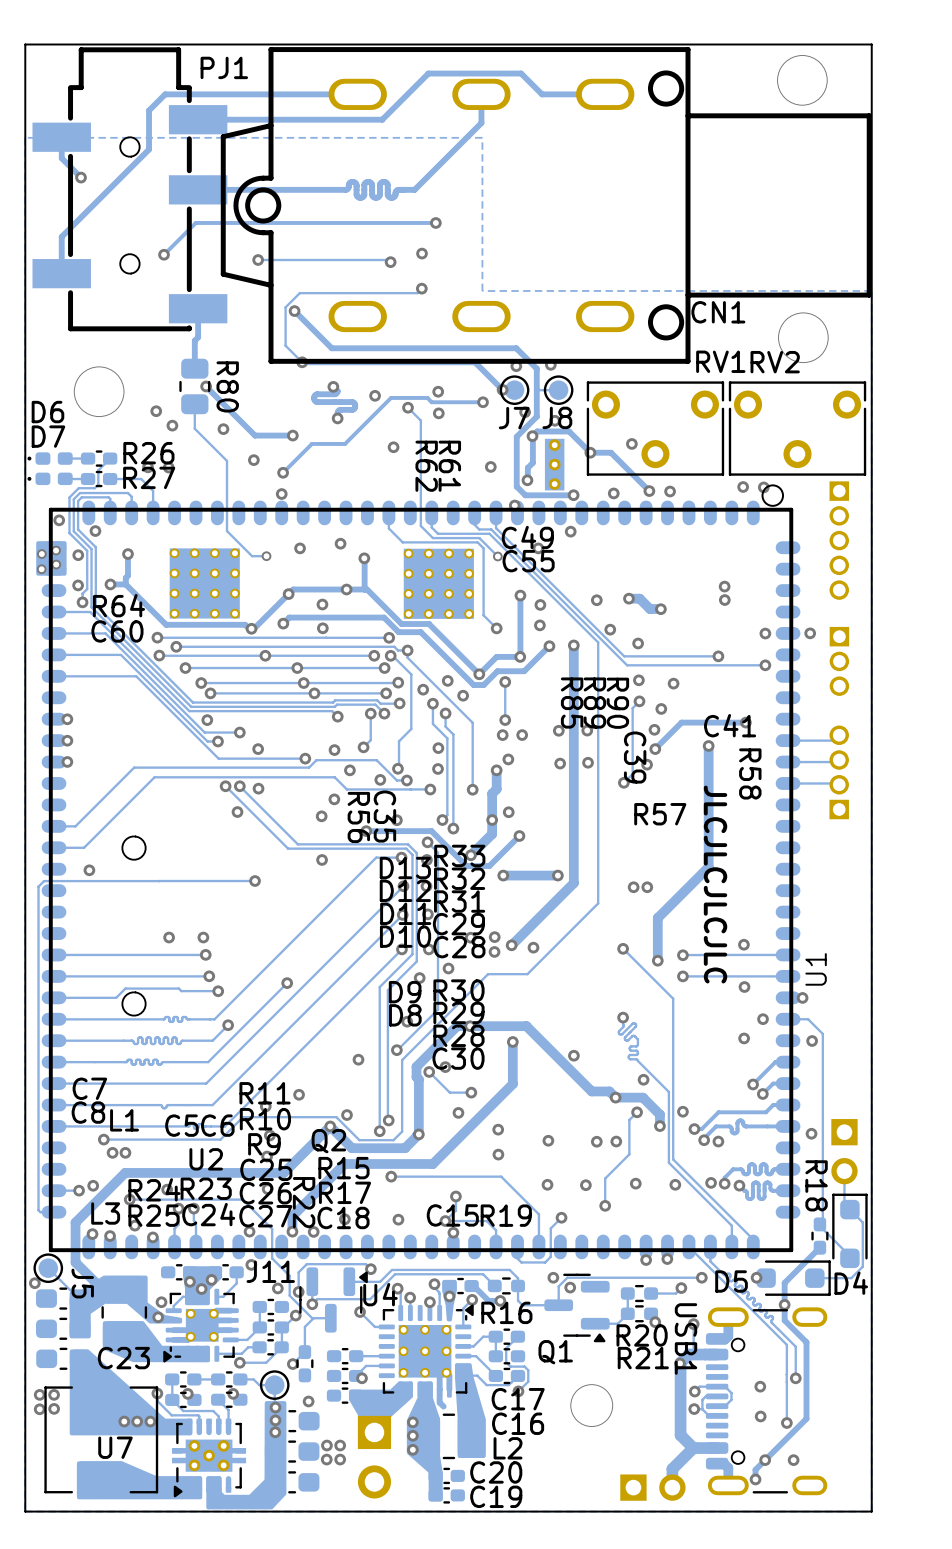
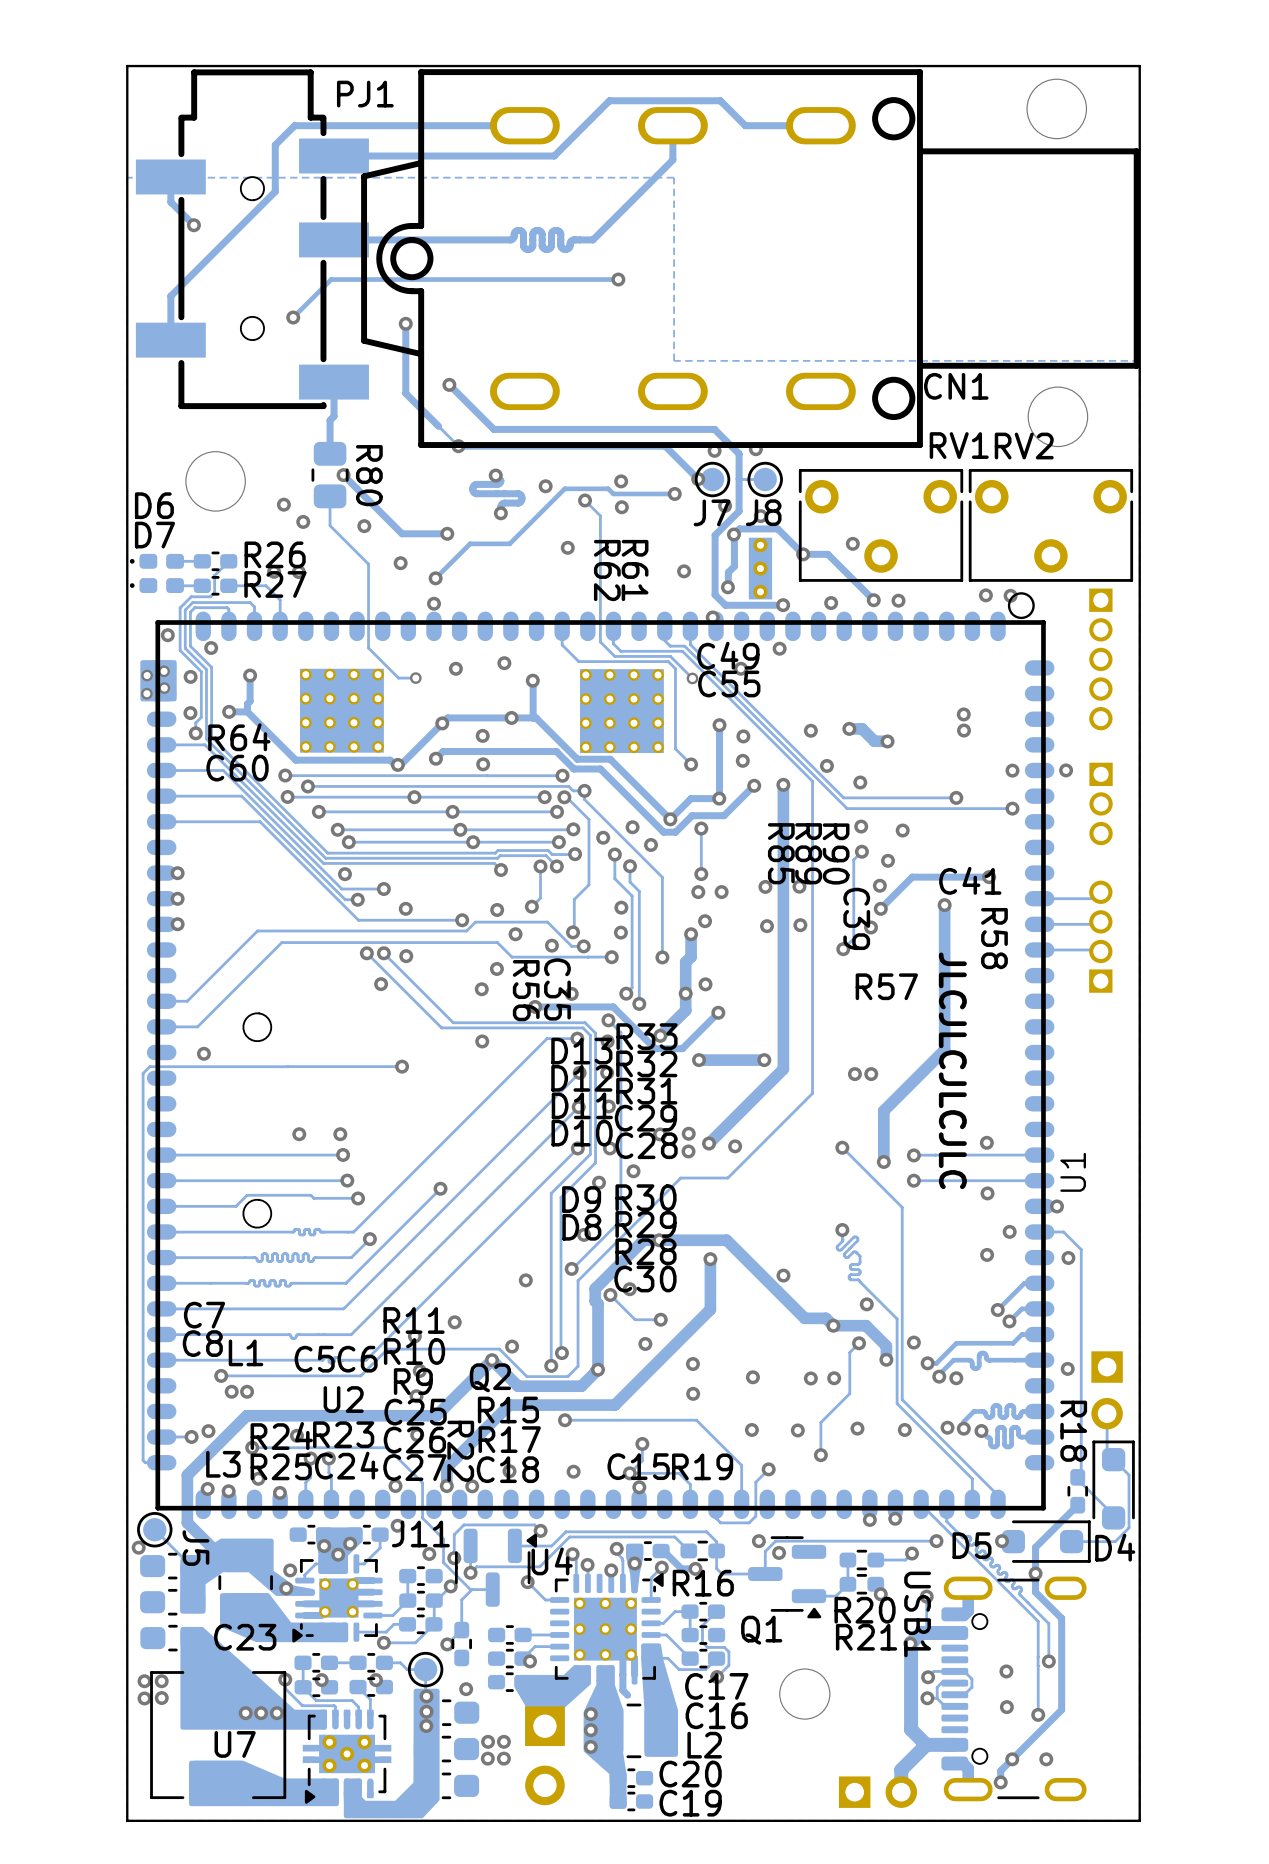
via: (422, 253) -> none
track: (258, 260) (388, 260) (390, 262) -> (405, 323) (405, 393) (438, 426)
via: (390, 262) -> none
track: (421, 288) (417, 293) (299, 293) (285, 307) (285, 345) -> none
via: (421, 288) -> none

